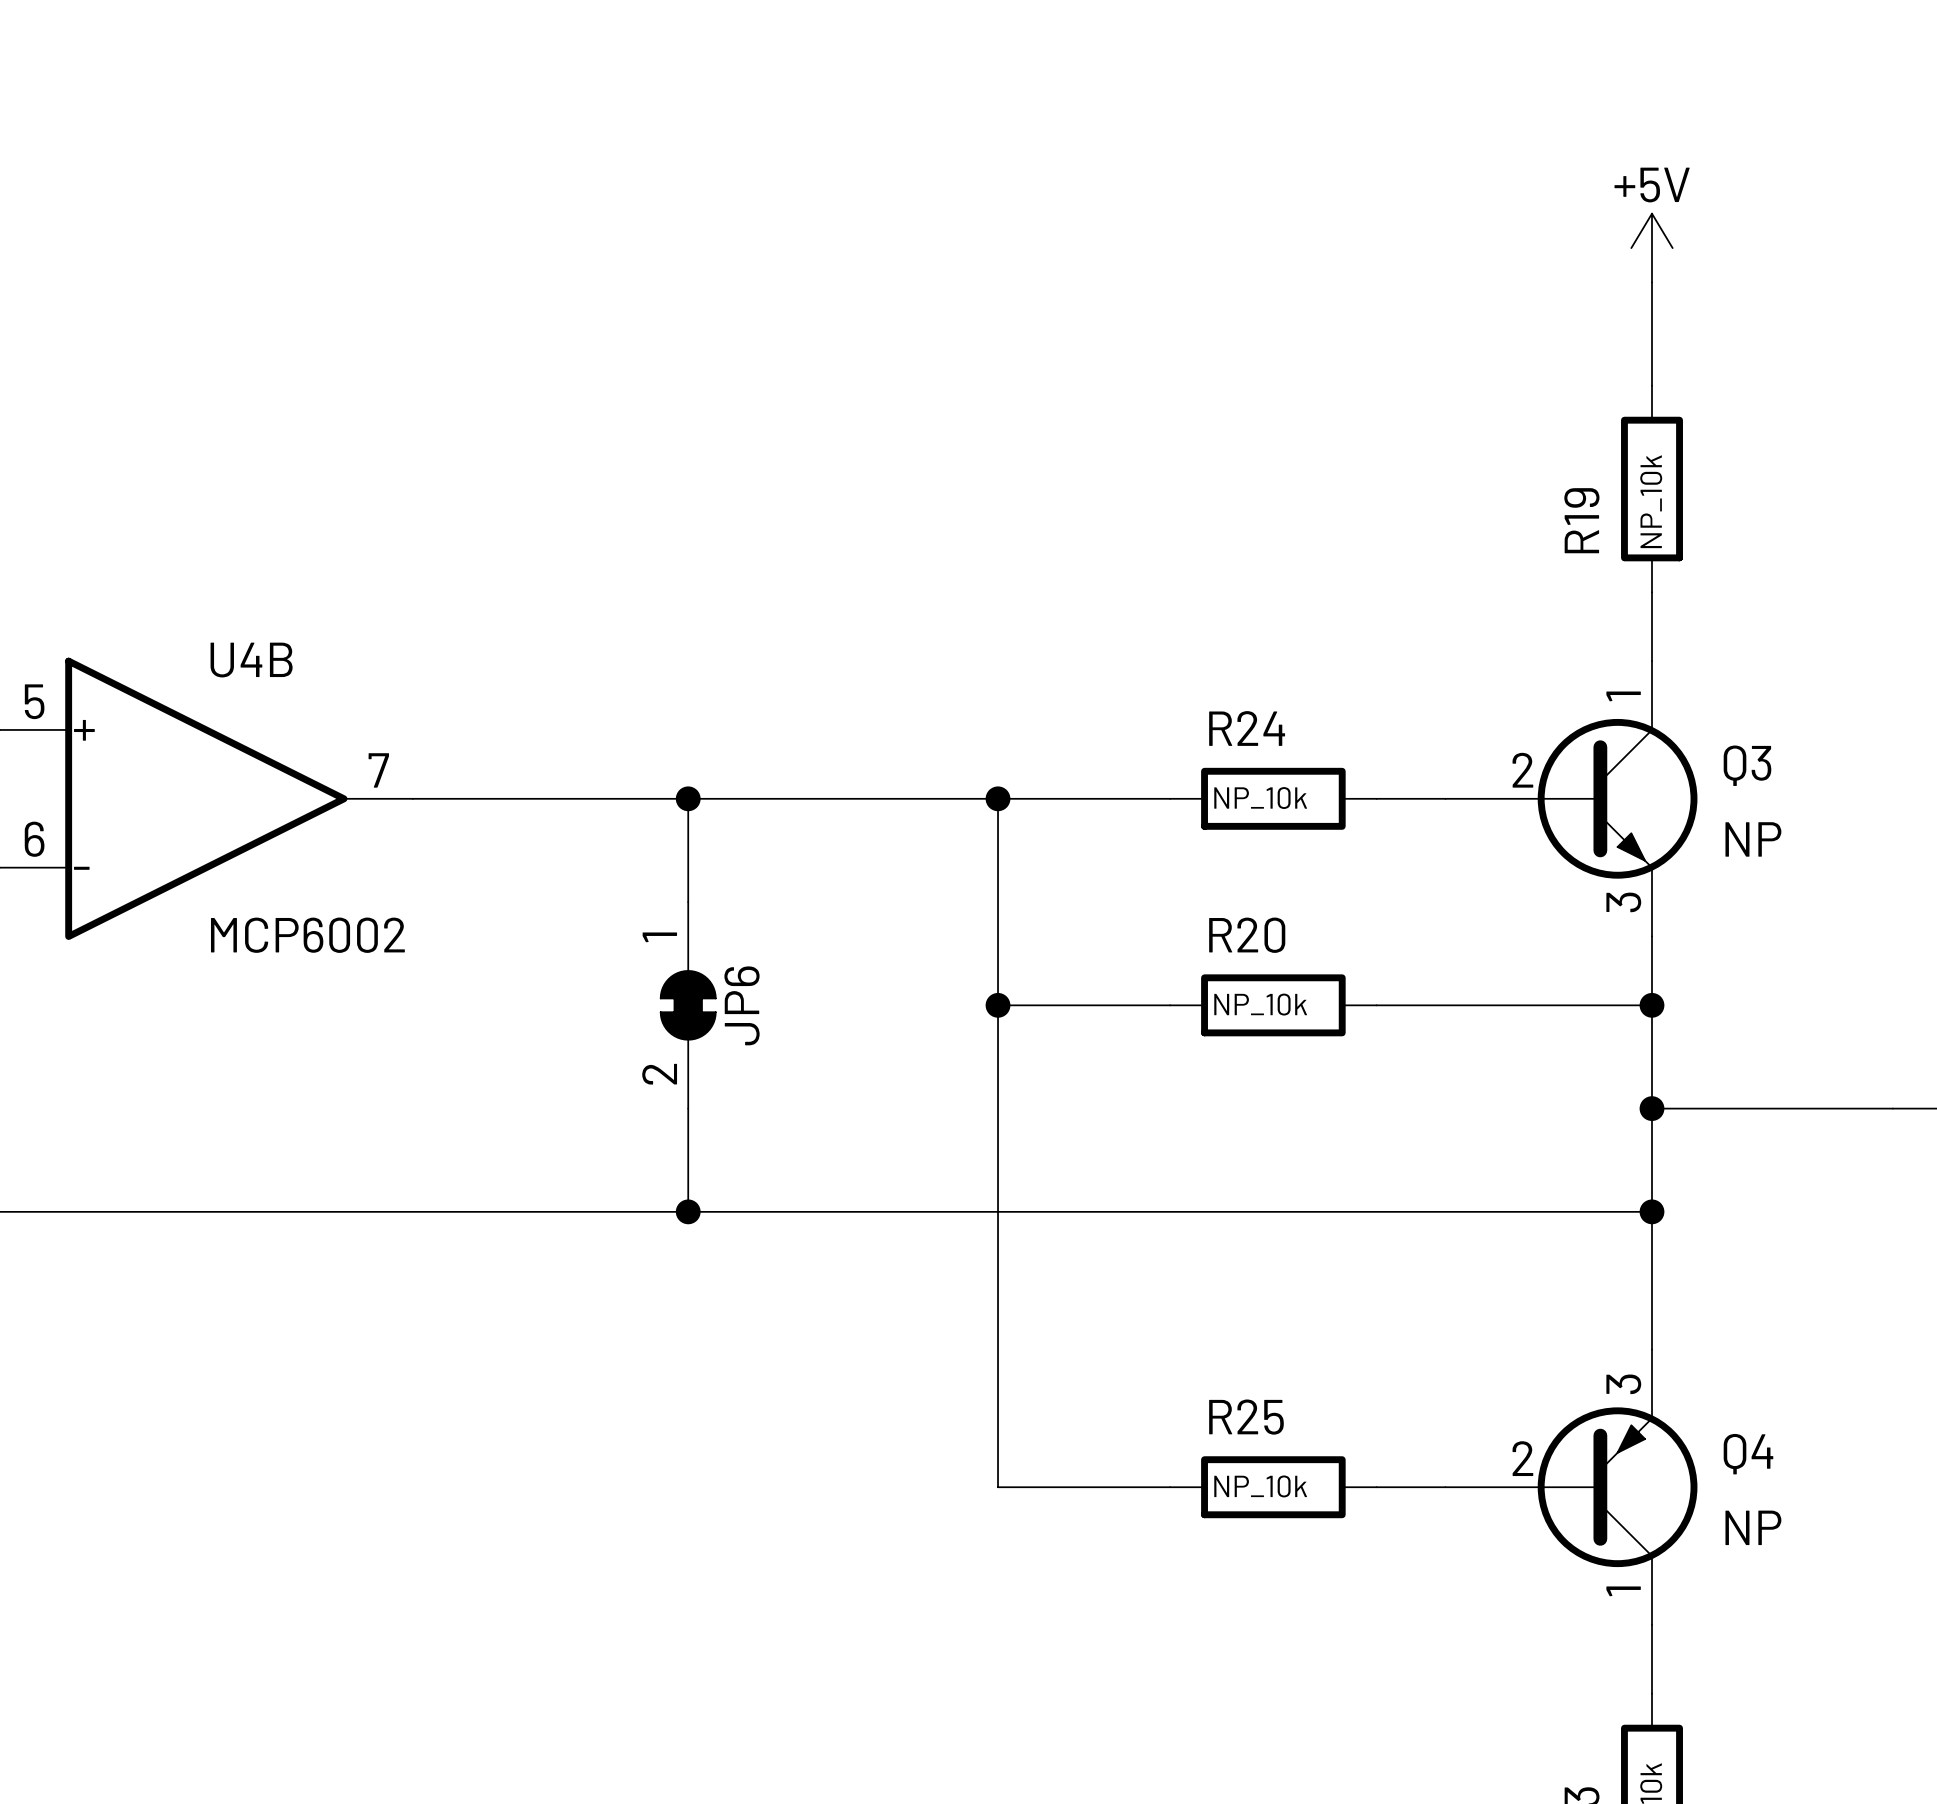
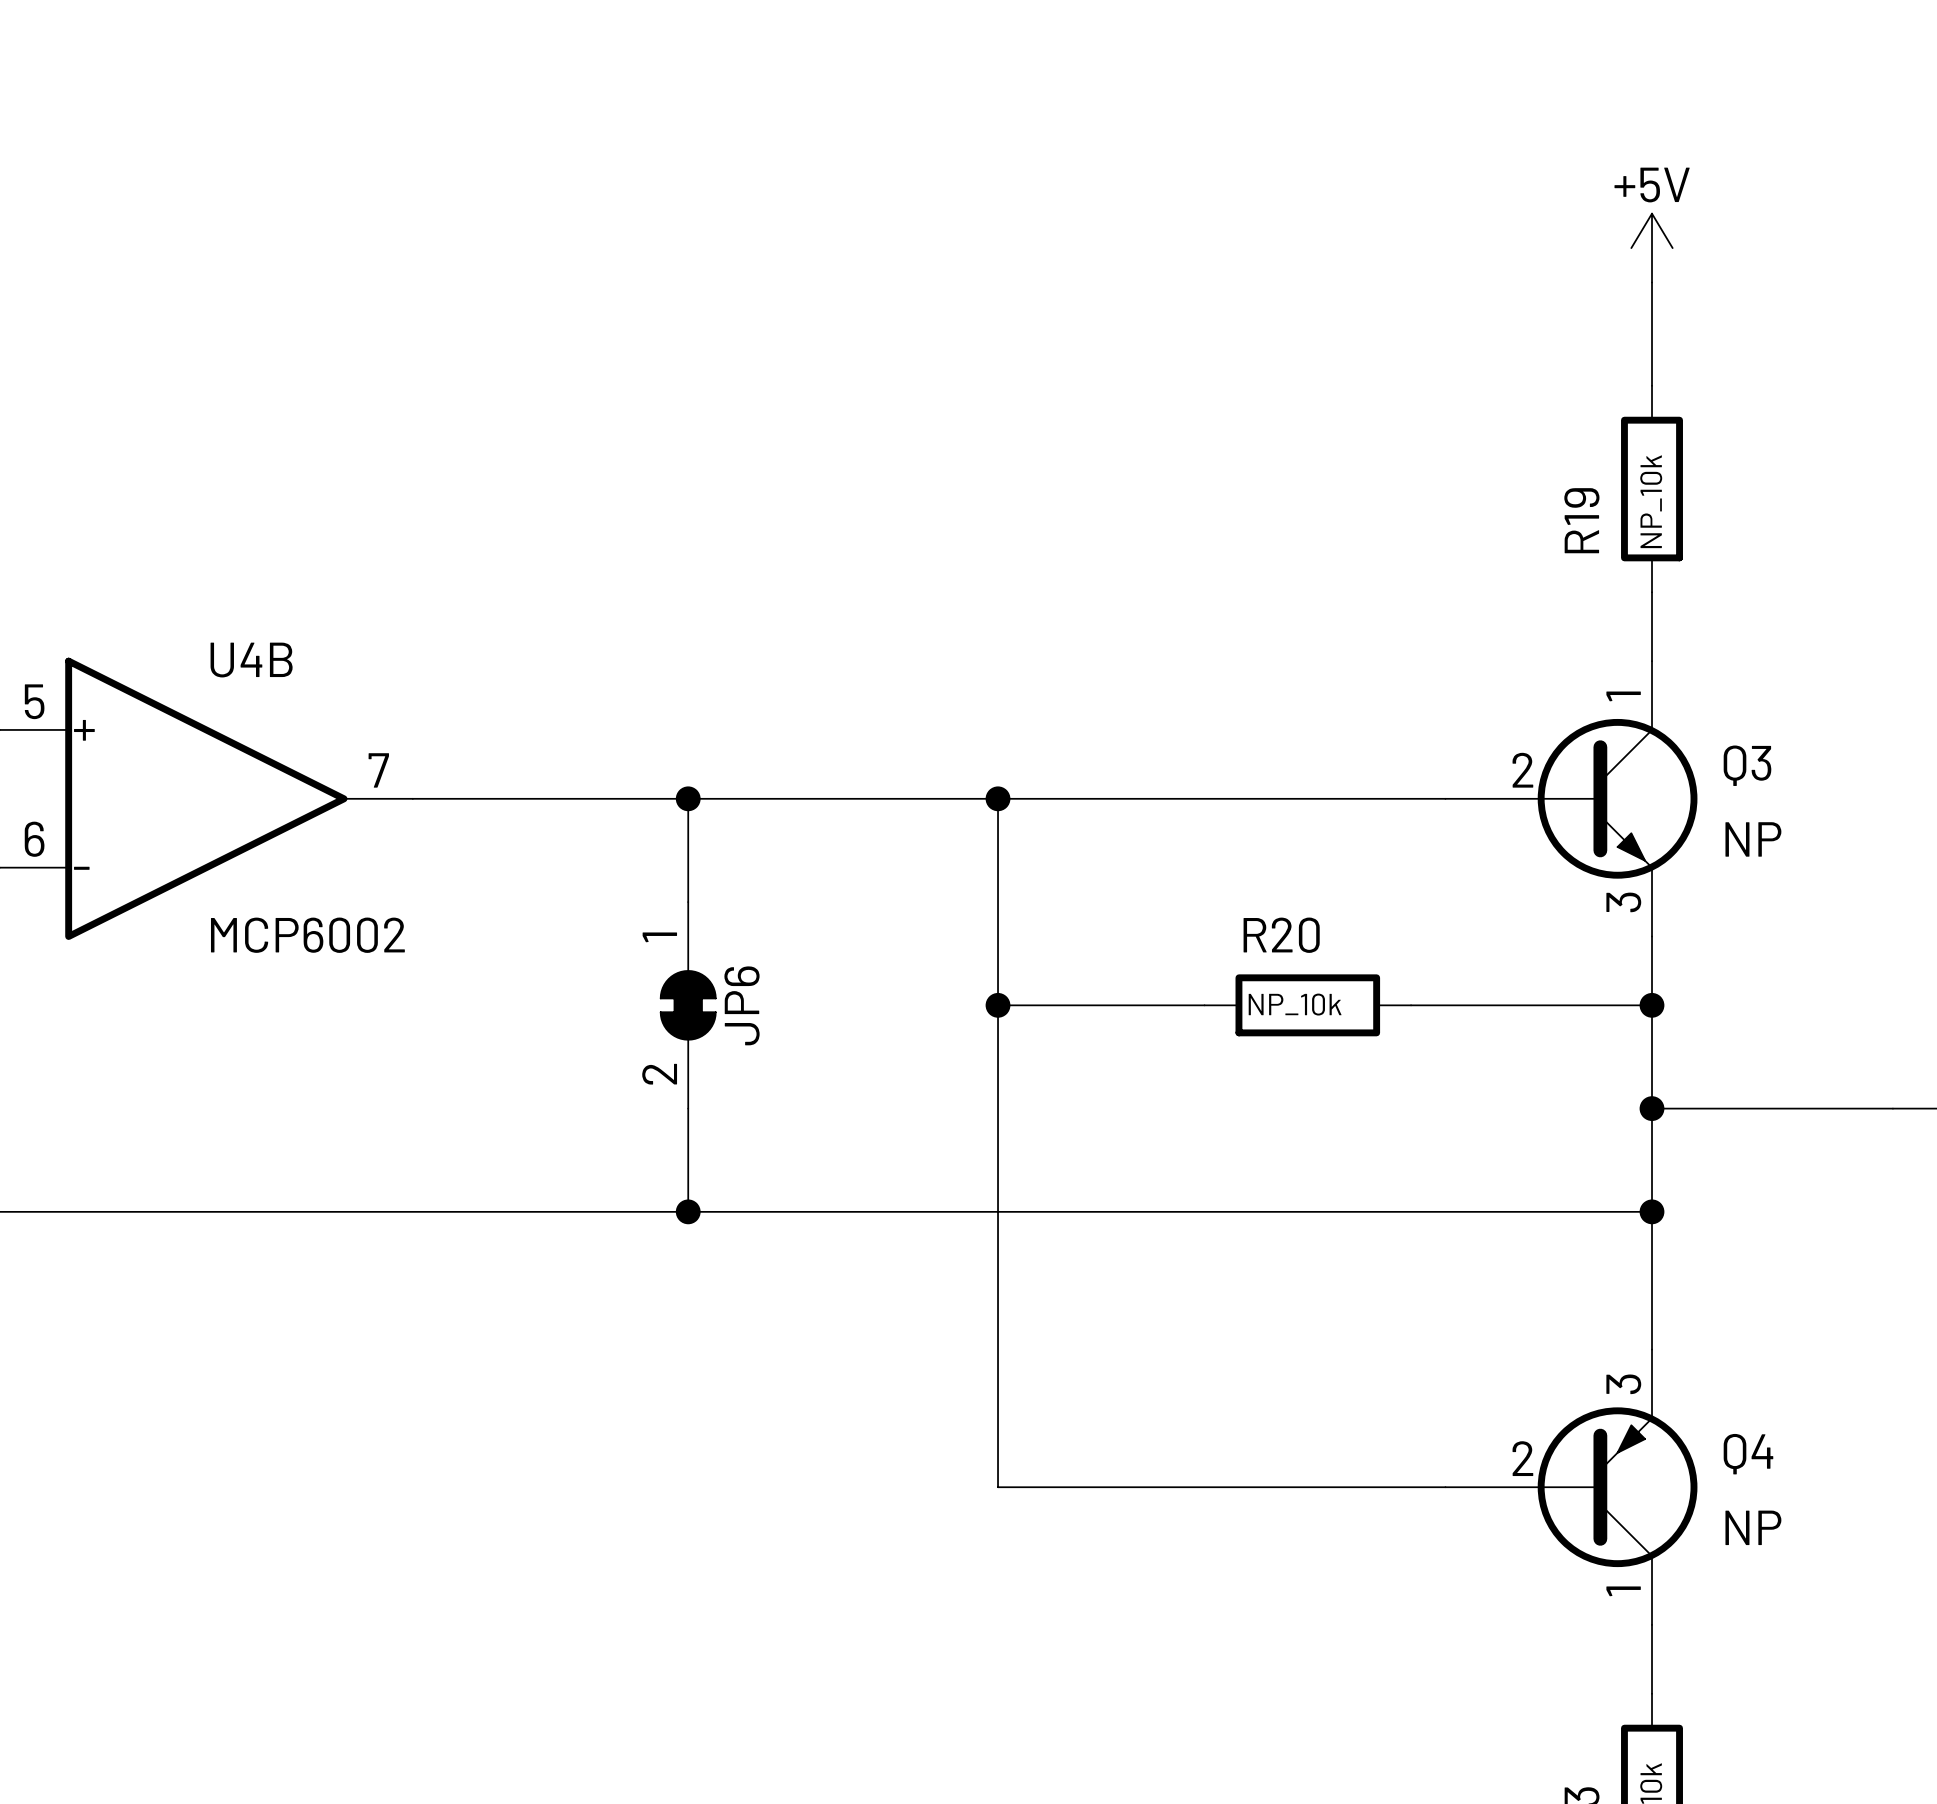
wire: none -> (1170, 798) (1376, 798)
R24: NP_10k (1273, 798) -> none
R20 position: (1273, 1005) -> (1307, 1005)
wire: none -> (1170, 1487) (1376, 1487)
R25: NP_10k (1273, 1487) -> none

